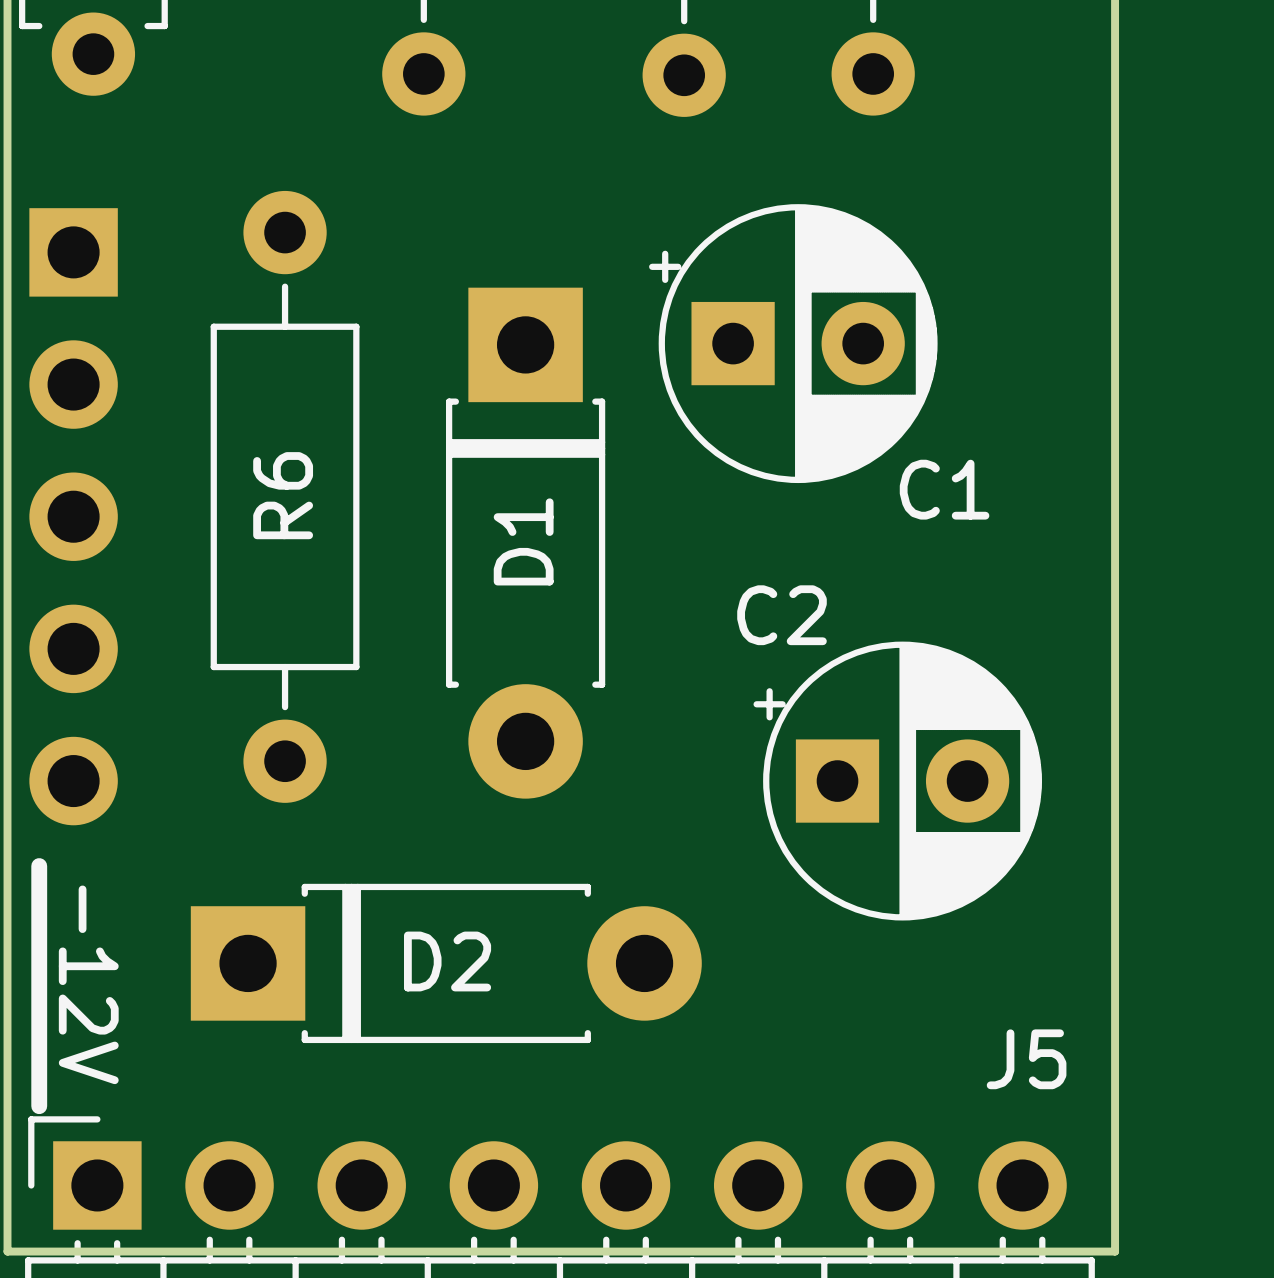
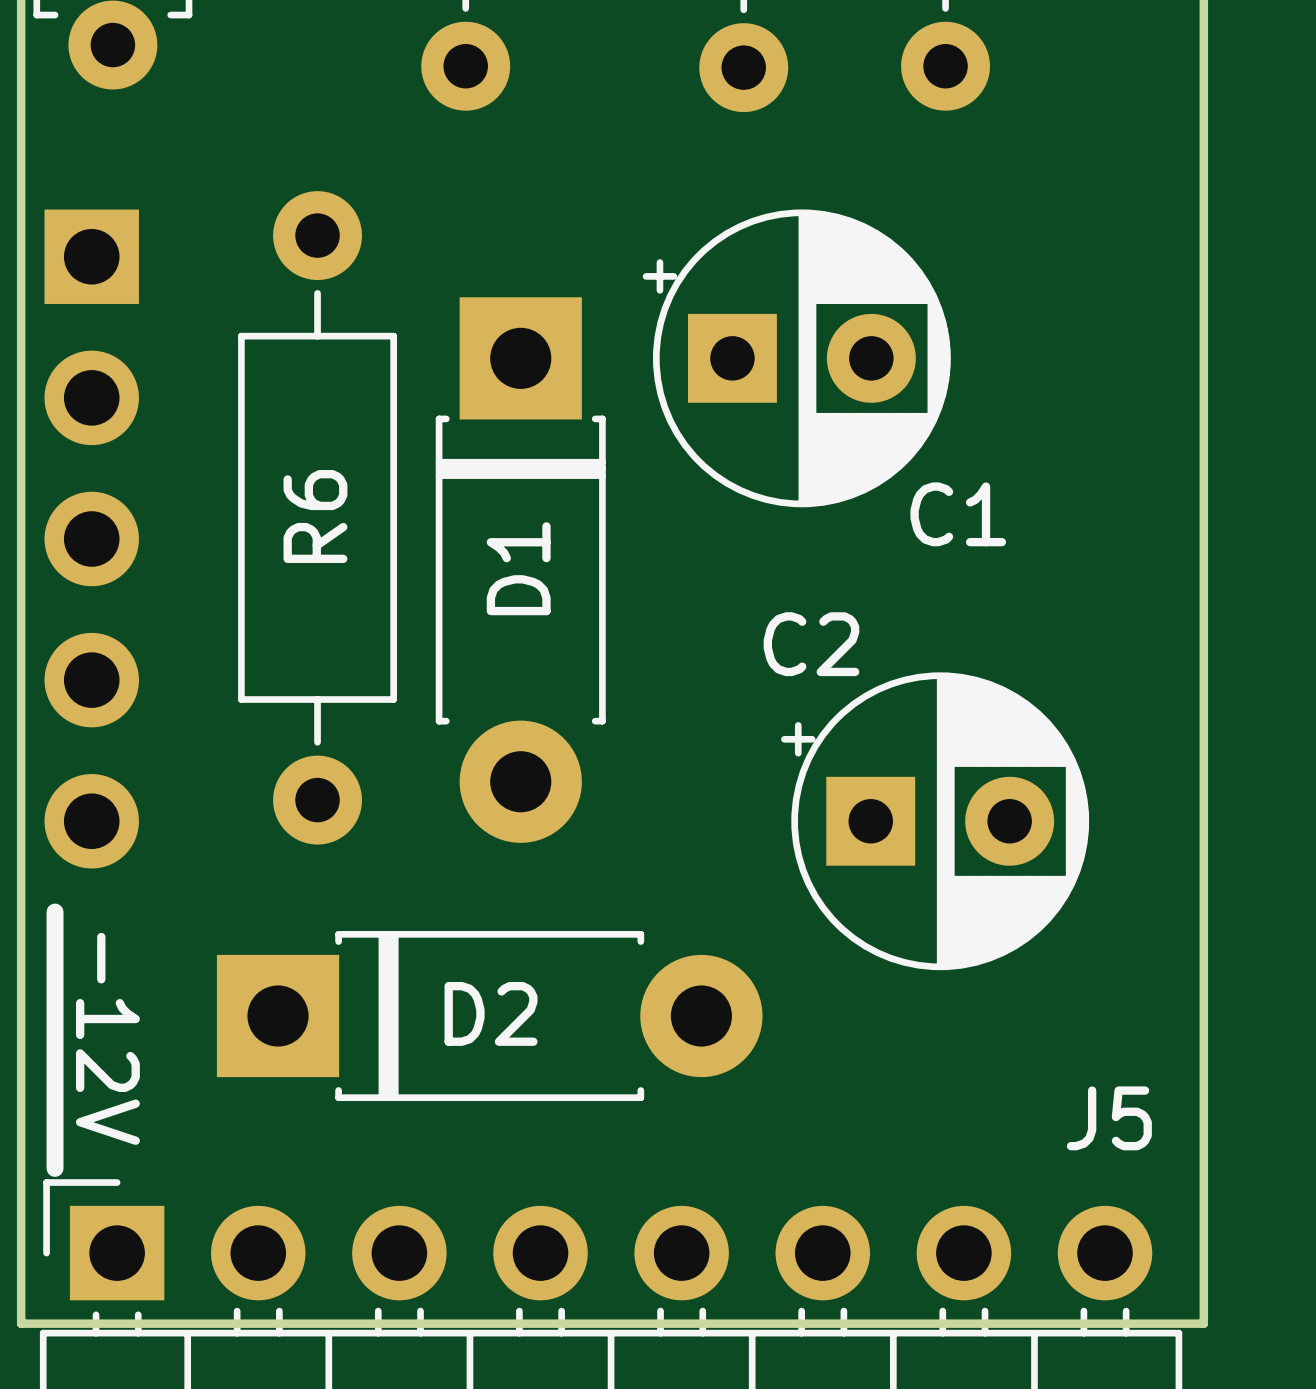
C1 position: (793, 343) -> (796, 358)
D1 position: (525, 543) -> (520, 570)
C2 position: (897, 781) -> (935, 821)

